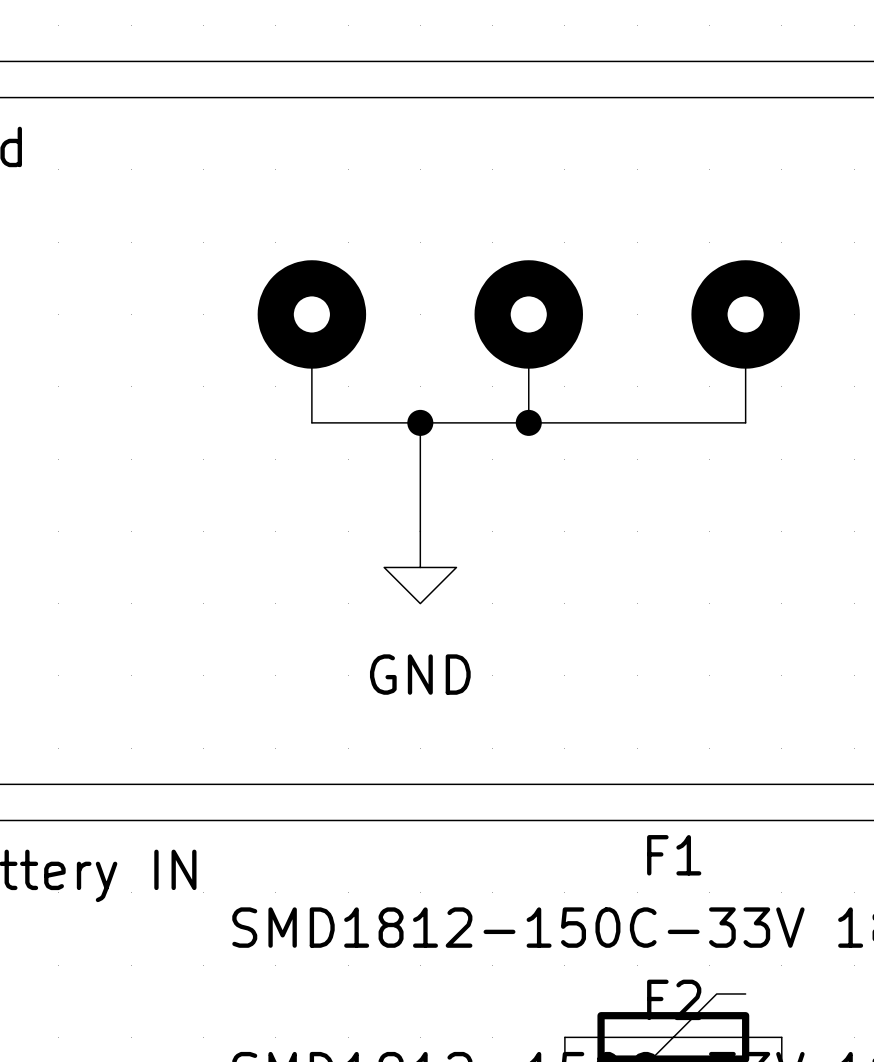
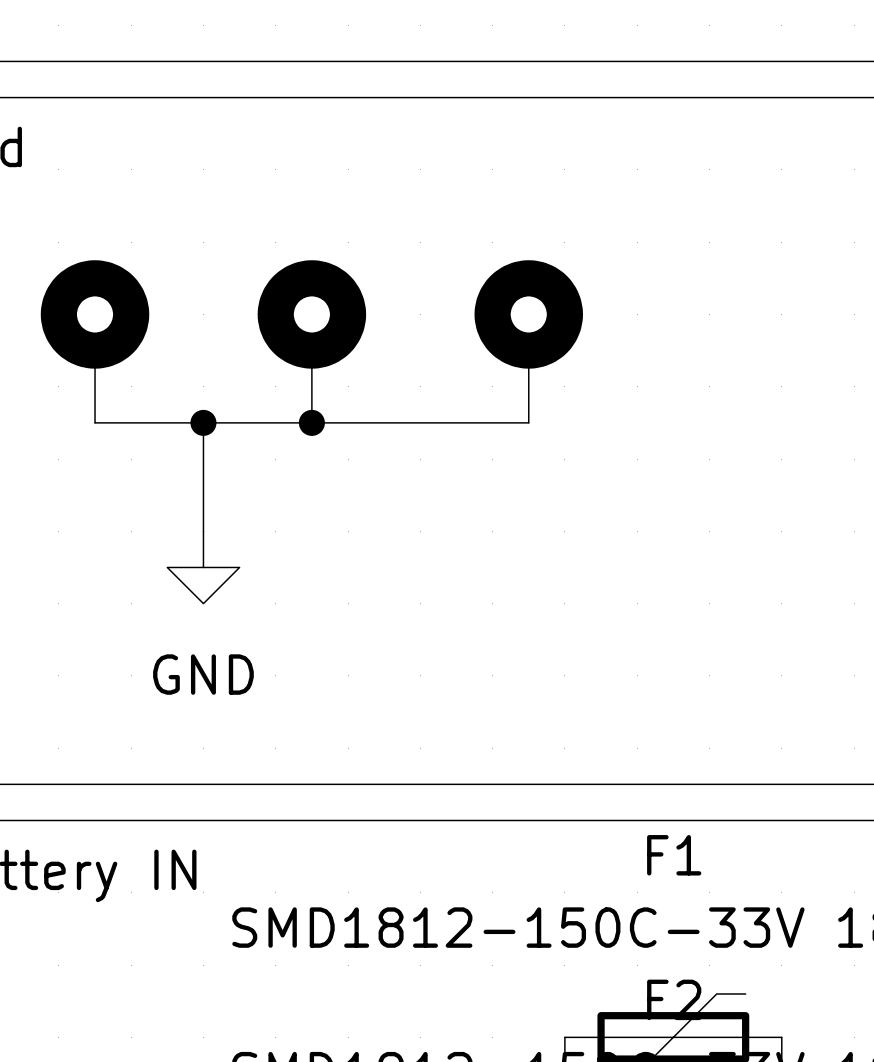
part position: (745, 341) -> (95, 341)
junction: none -> (203, 422)
junction: none -> (311, 422)
wire: (420, 422) (420, 531) -> (203, 422) (203, 531)
junction: (420, 422) -> none
wire: (528, 422) (745, 422) -> (95, 422) (311, 422)
junction: (528, 422) -> none
power symbol position: GND (420, 567) -> GND (203, 567)

